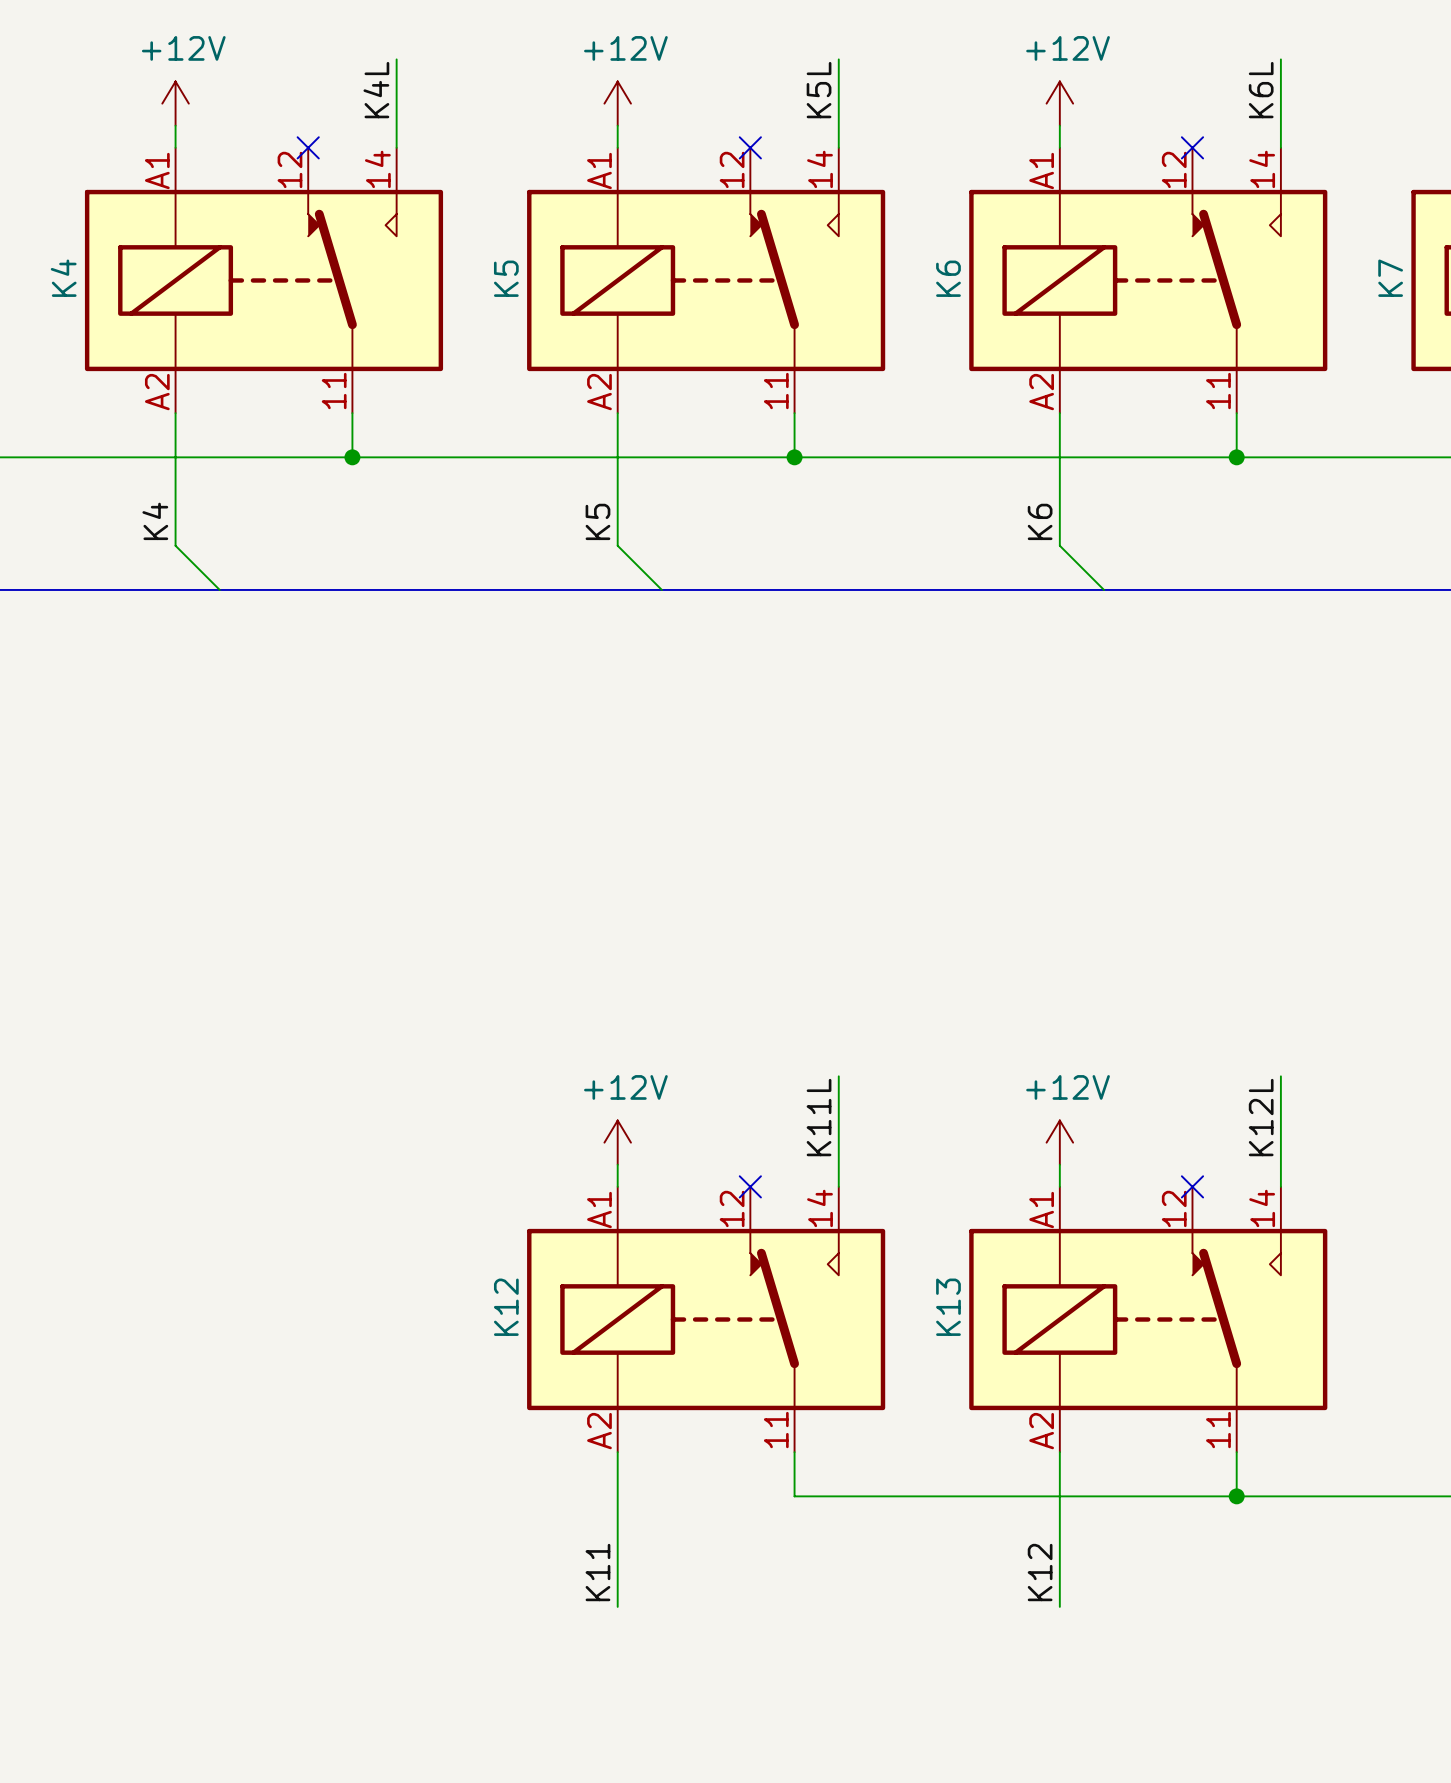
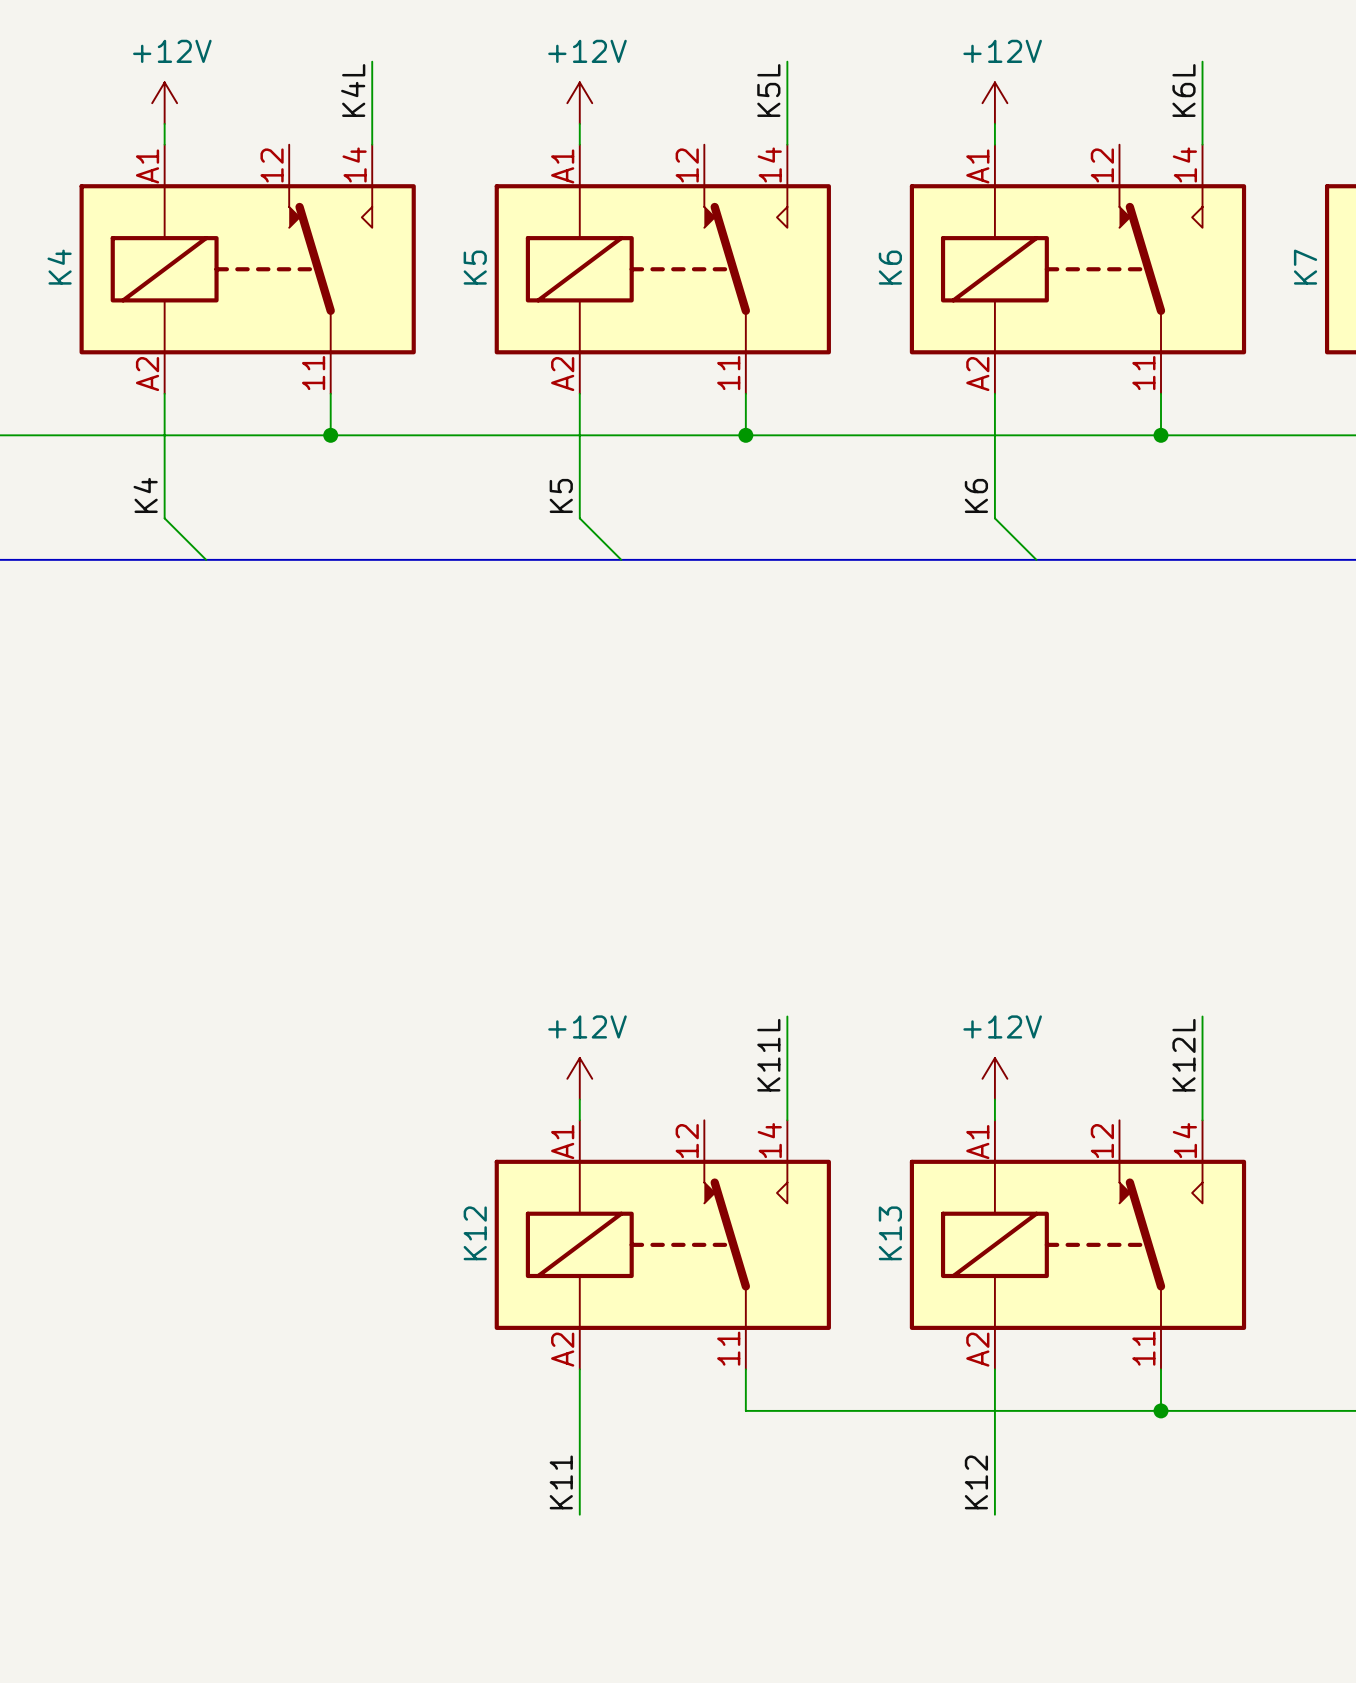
no-connect mark: (308, 147) -> none
no-connect mark: (750, 147) -> none
no-connect mark: (1192, 147) -> none
no-connect mark: (750, 1186) -> none
no-connect mark: (1192, 1186) -> none

